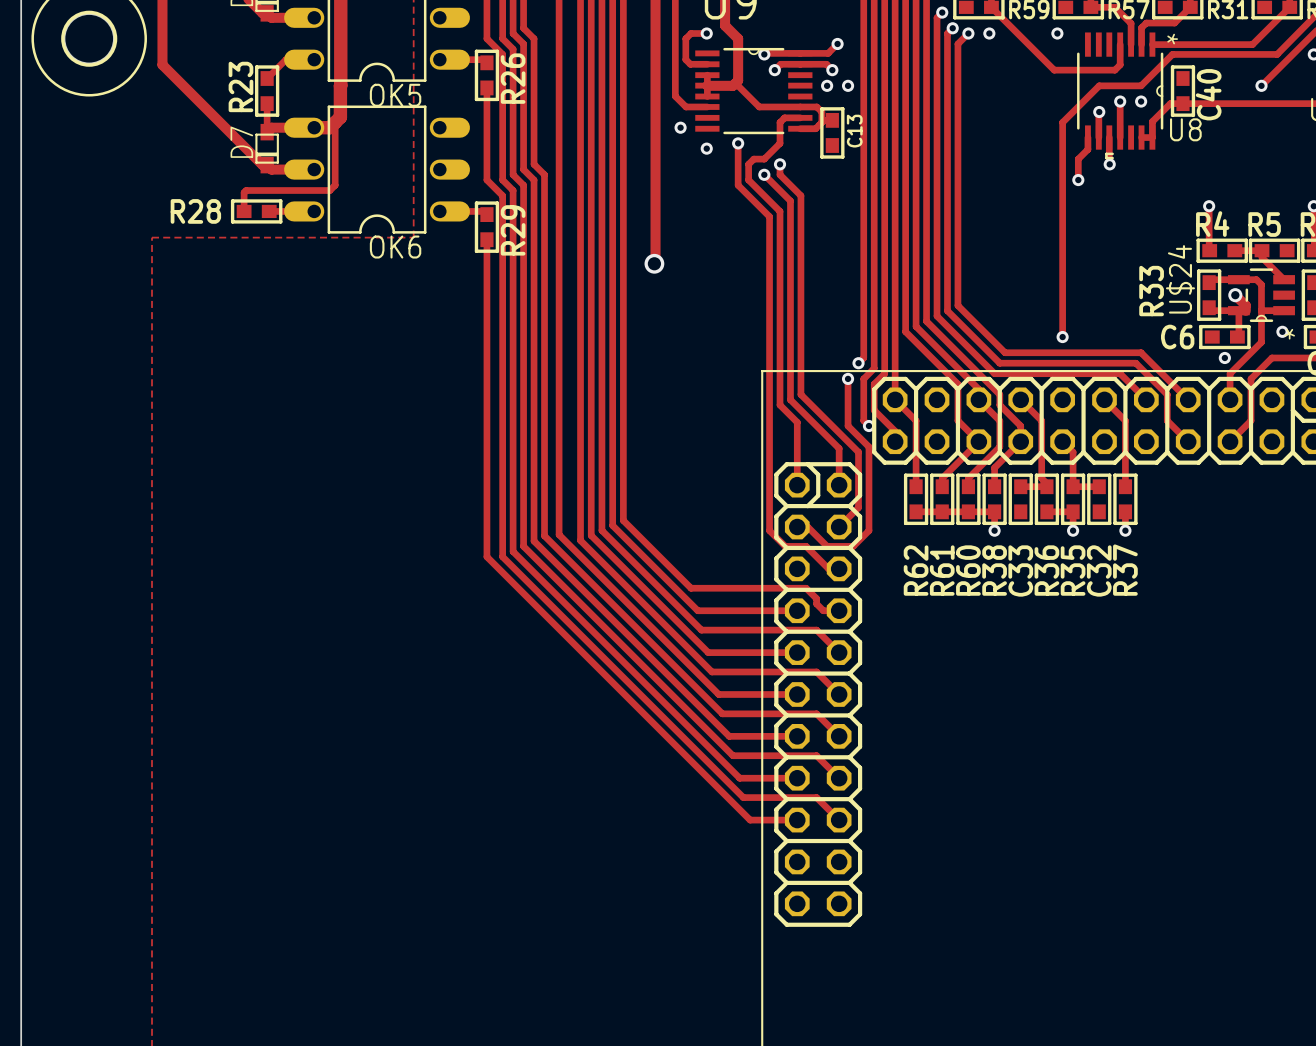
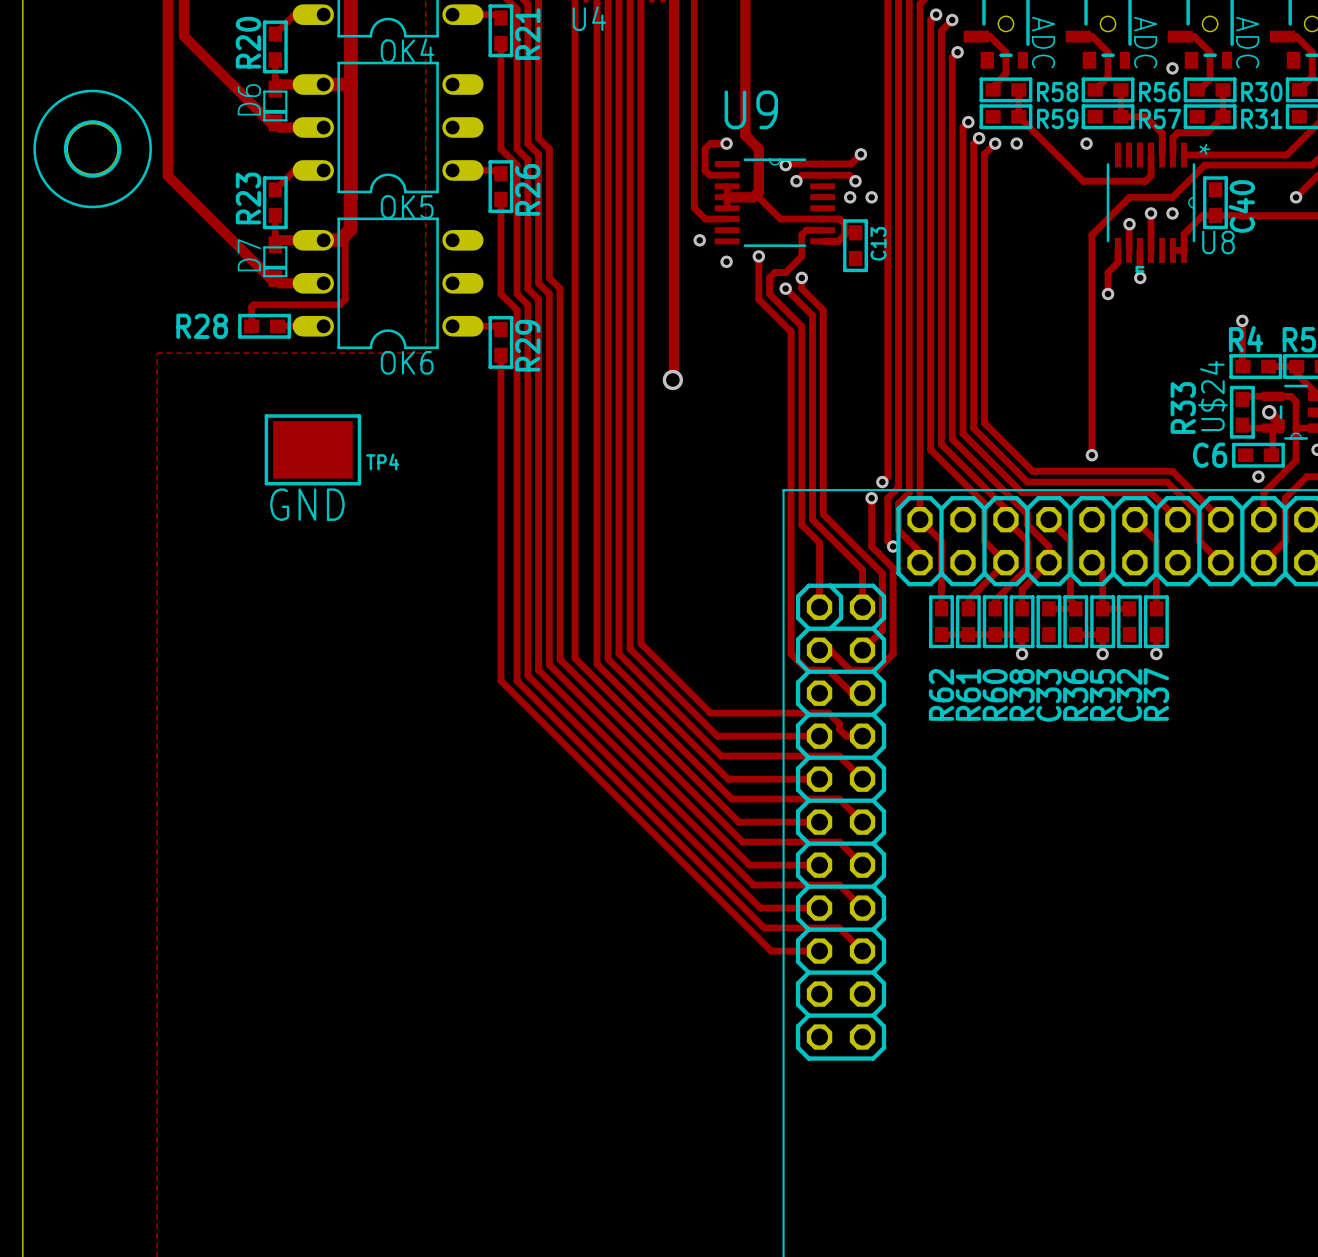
TP4: none -> (312, 449)
text: none -> GND (307, 504)

